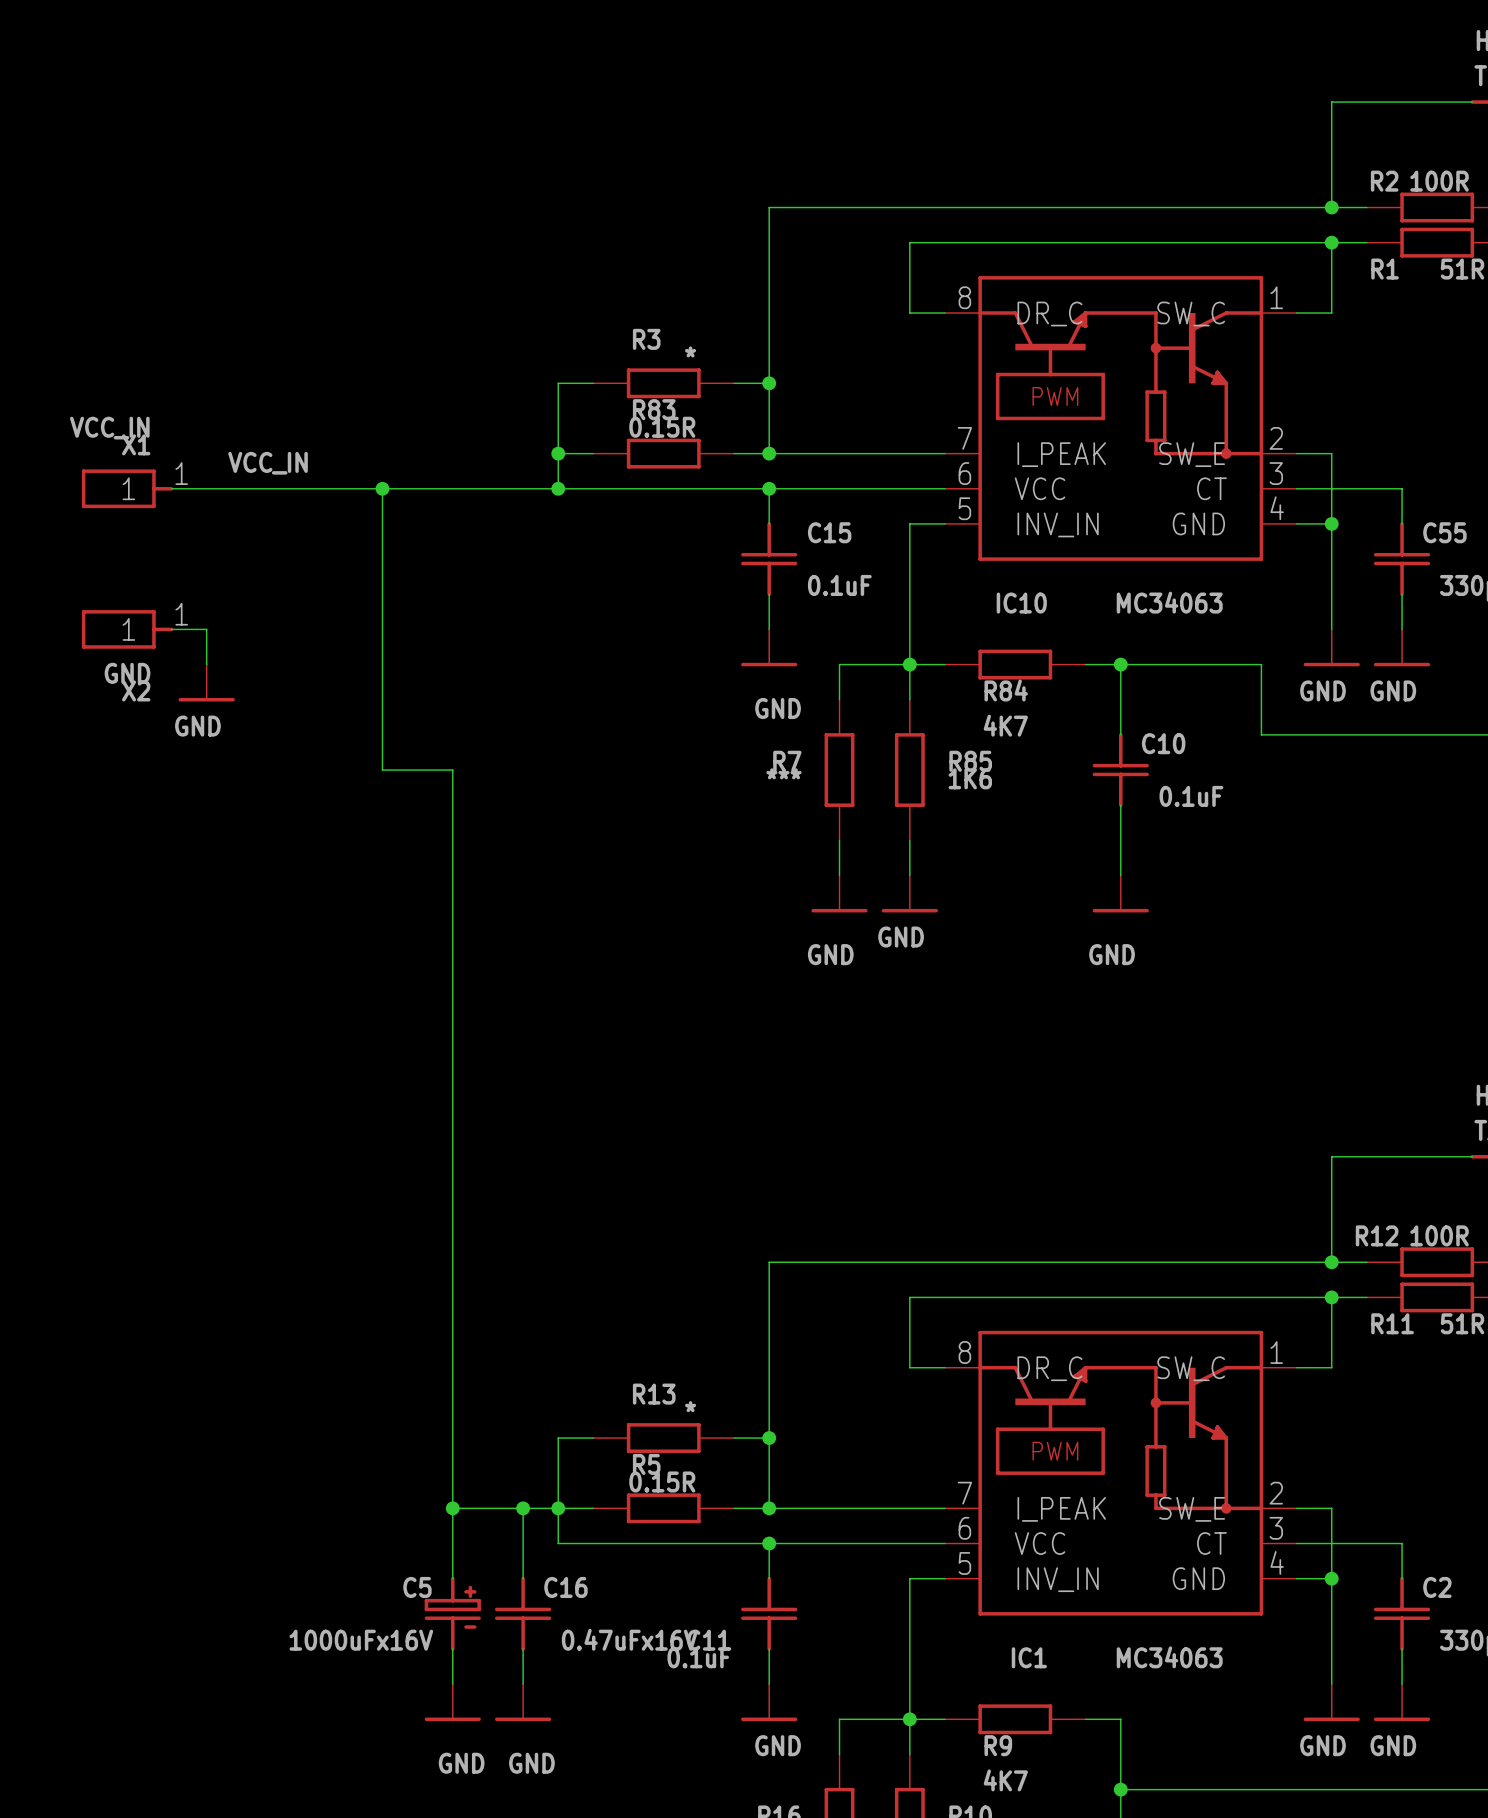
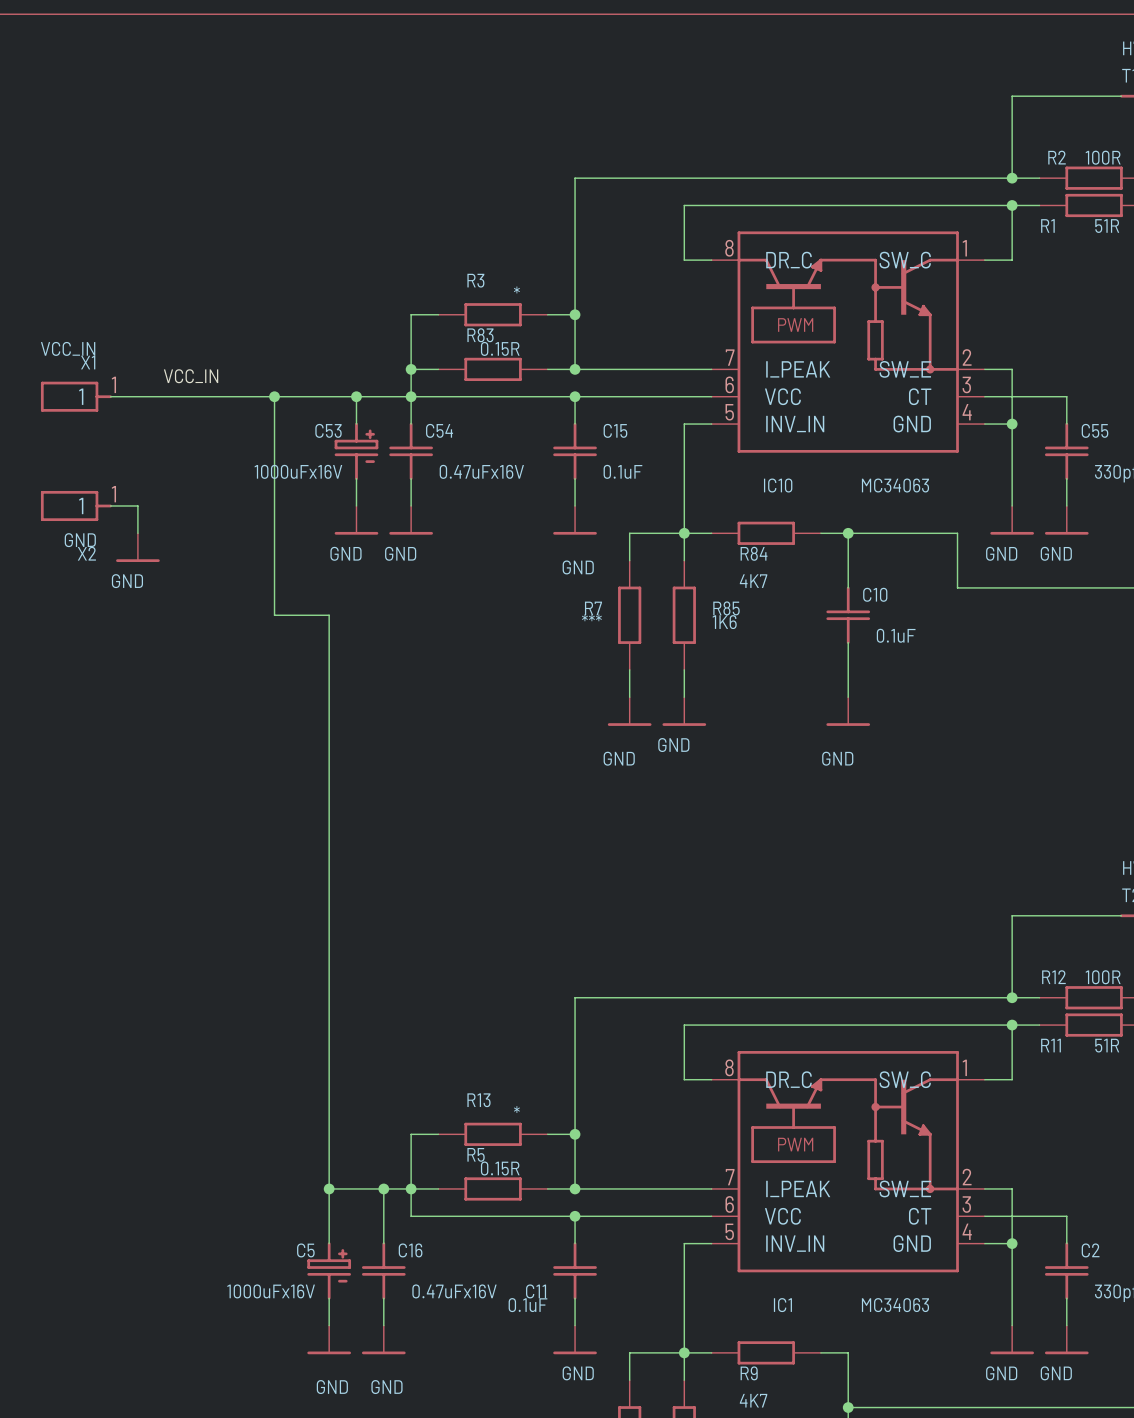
wire: none -> (356, 396) (356, 424)
junction: none -> (356, 396)
wire: none -> (411, 396) (411, 424)
C53: none -> 1000uFx16V (356, 451)
C54: none -> 0.47uFx16V (411, 451)
wire: none -> (356, 478) (356, 505)
wire: none -> (411, 478) (411, 505)
power symbol: none -> GND (356, 520)
power symbol: none -> GND (411, 520)

